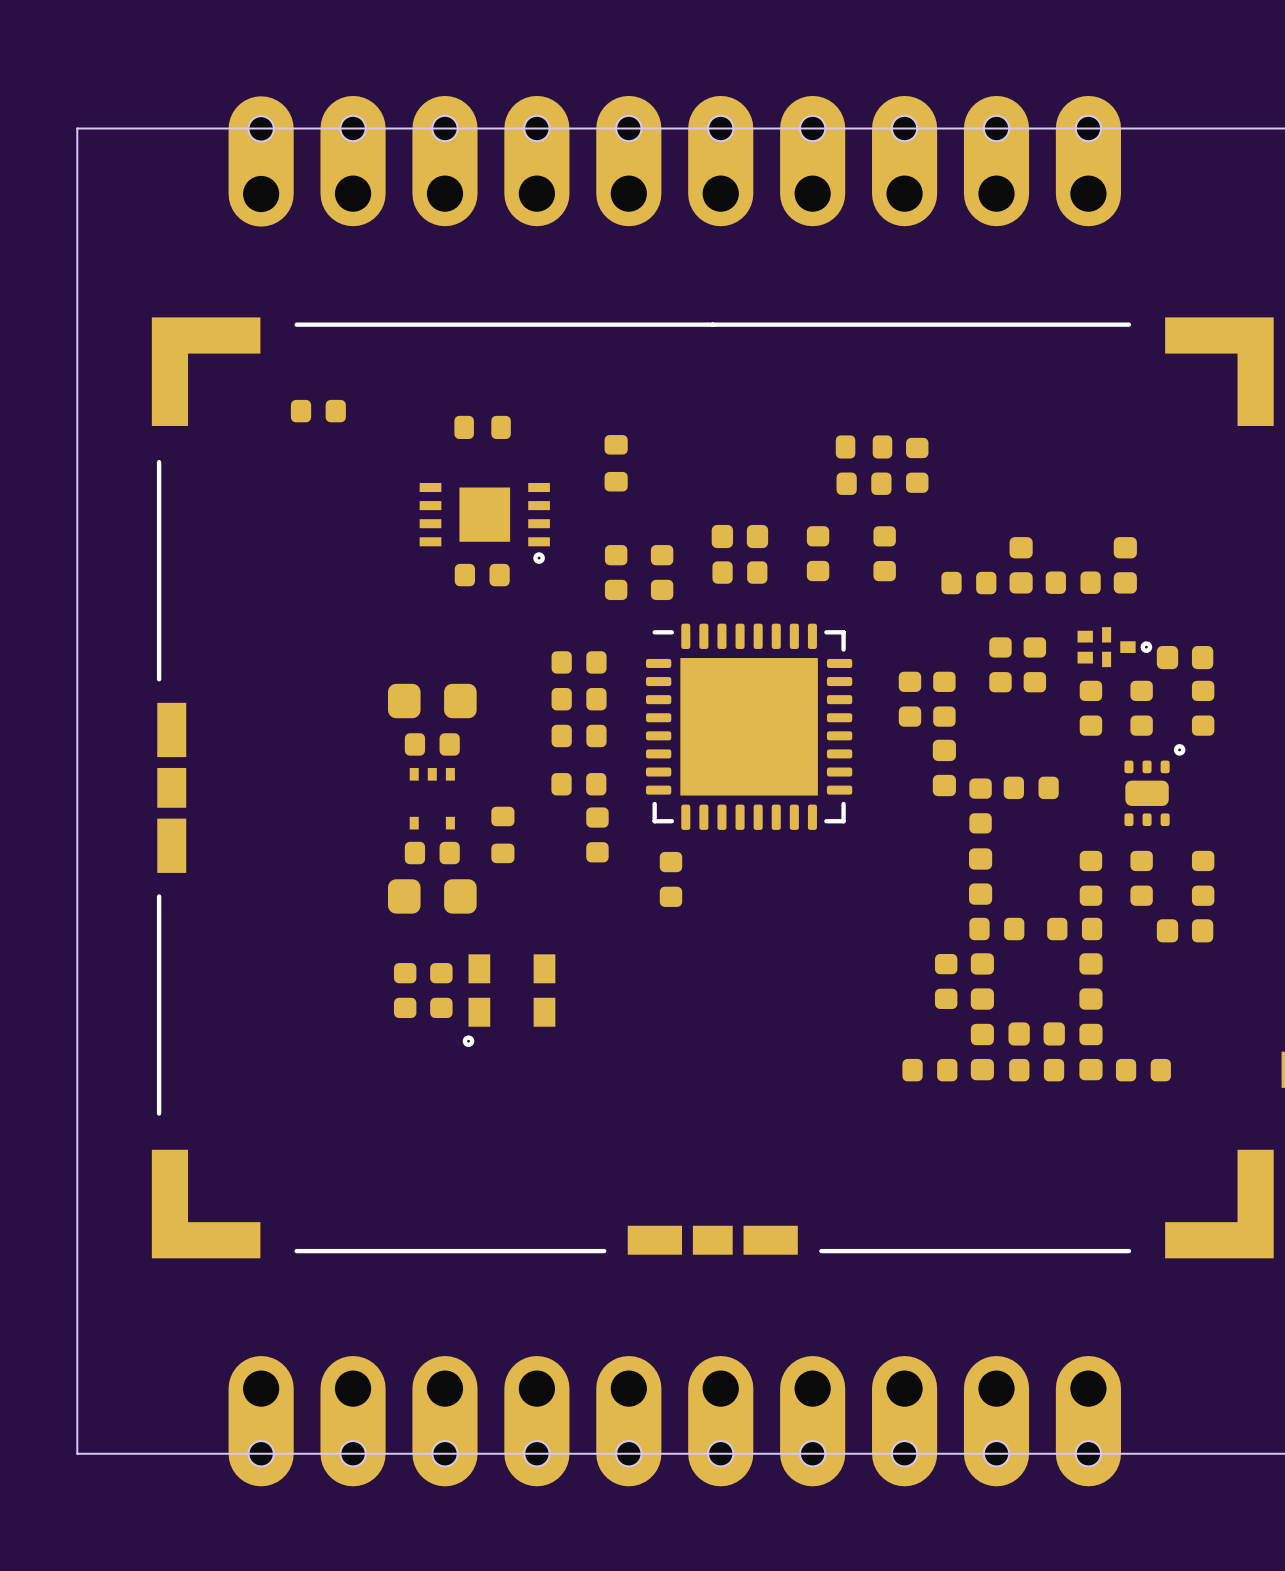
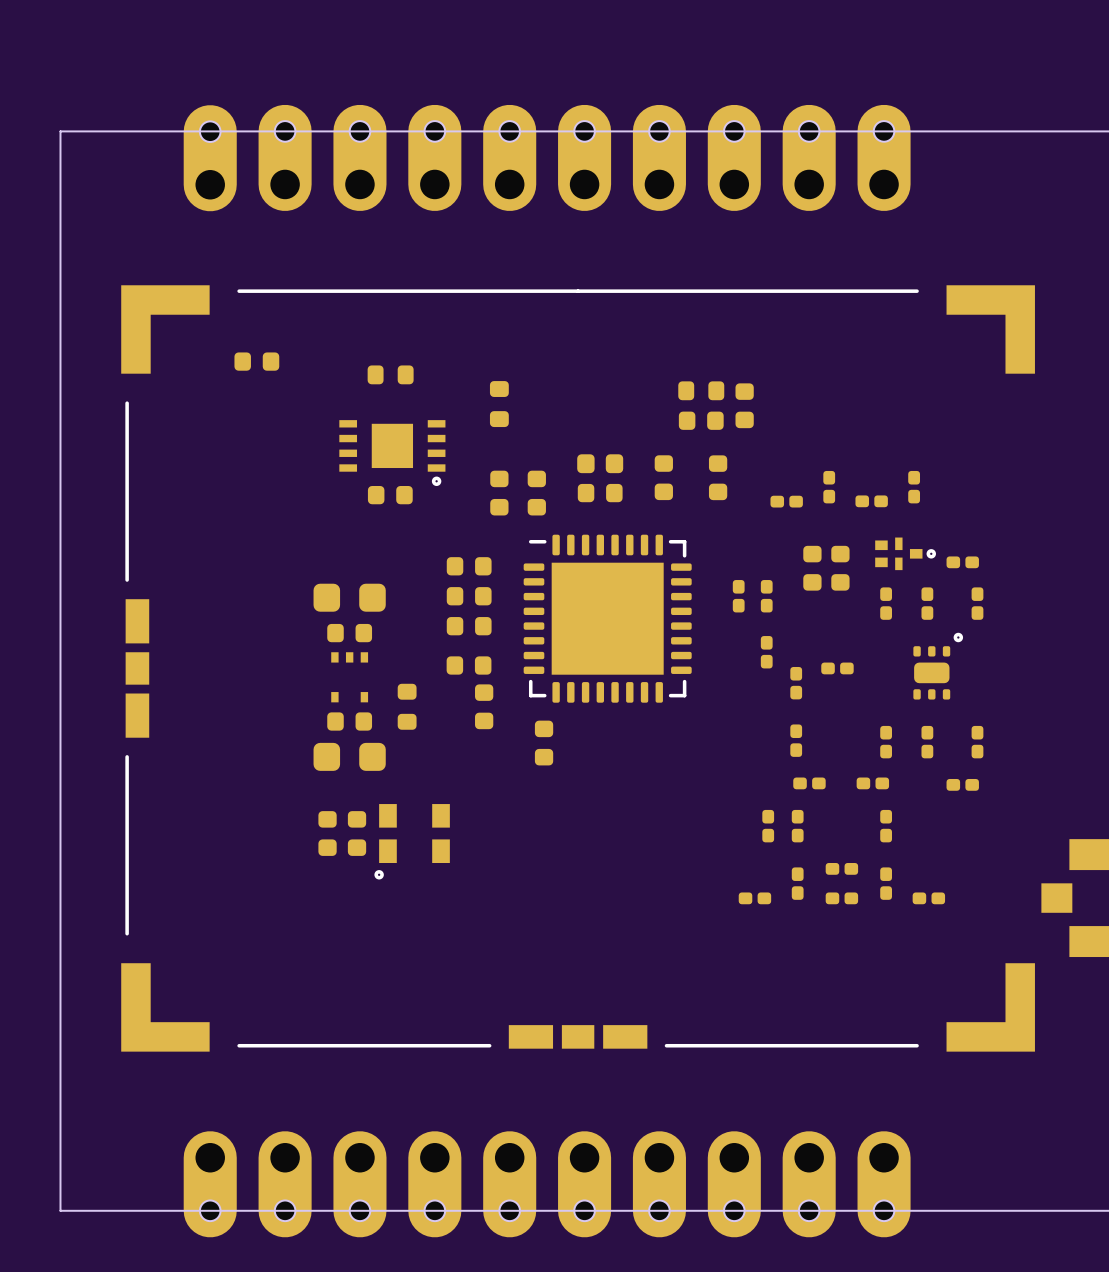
part footprint: [1009, 537, 1033, 594] -> [823, 470, 836, 504]
part footprint: [1113, 537, 1137, 594] -> [908, 470, 921, 504]
part footprint: [941, 571, 997, 595] -> [770, 495, 803, 508]
part footprint: [1045, 571, 1101, 594] -> [855, 495, 888, 508]
part footprint: [1156, 646, 1214, 670] -> [946, 556, 979, 569]
part footprint: [898, 671, 922, 727] -> [732, 580, 745, 613]
part footprint: [933, 671, 956, 727] -> [760, 580, 773, 613]
part footprint: [1079, 680, 1103, 736] -> [880, 587, 893, 620]
part footprint: [1130, 680, 1153, 736] -> [921, 587, 934, 620]
part footprint: [1191, 680, 1215, 736] -> [971, 587, 984, 620]
part footprint: [932, 739, 956, 797] -> [760, 636, 773, 669]
part footprint: [1003, 776, 1059, 800] -> [821, 662, 854, 675]
part footprint: [969, 778, 992, 834] -> [790, 666, 803, 700]
part footprint: [969, 848, 993, 905] -> [790, 724, 803, 757]
part footprint: [1079, 850, 1103, 906] -> [880, 725, 893, 759]
part footprint: [1130, 850, 1153, 906] -> [921, 725, 934, 759]
part footprint: [1191, 850, 1215, 906] -> [971, 725, 984, 759]
part footprint: [969, 917, 1025, 941] -> [793, 777, 826, 790]
part footprint: [1047, 917, 1103, 941] -> [856, 777, 890, 790]
part footprint: [1156, 919, 1214, 943] -> [946, 778, 979, 791]
part footprint: [934, 953, 958, 1009] -> [762, 809, 775, 843]
part footprint: [970, 953, 994, 1010] -> [791, 809, 804, 843]
part footprint: [1079, 953, 1103, 1010] -> [880, 809, 893, 843]
part footprint: [1008, 1022, 1065, 1046] -> [825, 862, 859, 875]
part footprint: [970, 1023, 994, 1081] -> [791, 867, 804, 900]
part footprint: [1079, 1023, 1103, 1081] -> [880, 867, 893, 900]
part footprint: [902, 1058, 958, 1082] -> [738, 892, 772, 905]
part footprint: [1009, 1058, 1065, 1082] -> [825, 892, 859, 905]
part footprint: [1115, 1058, 1171, 1082] -> [912, 892, 946, 905]

